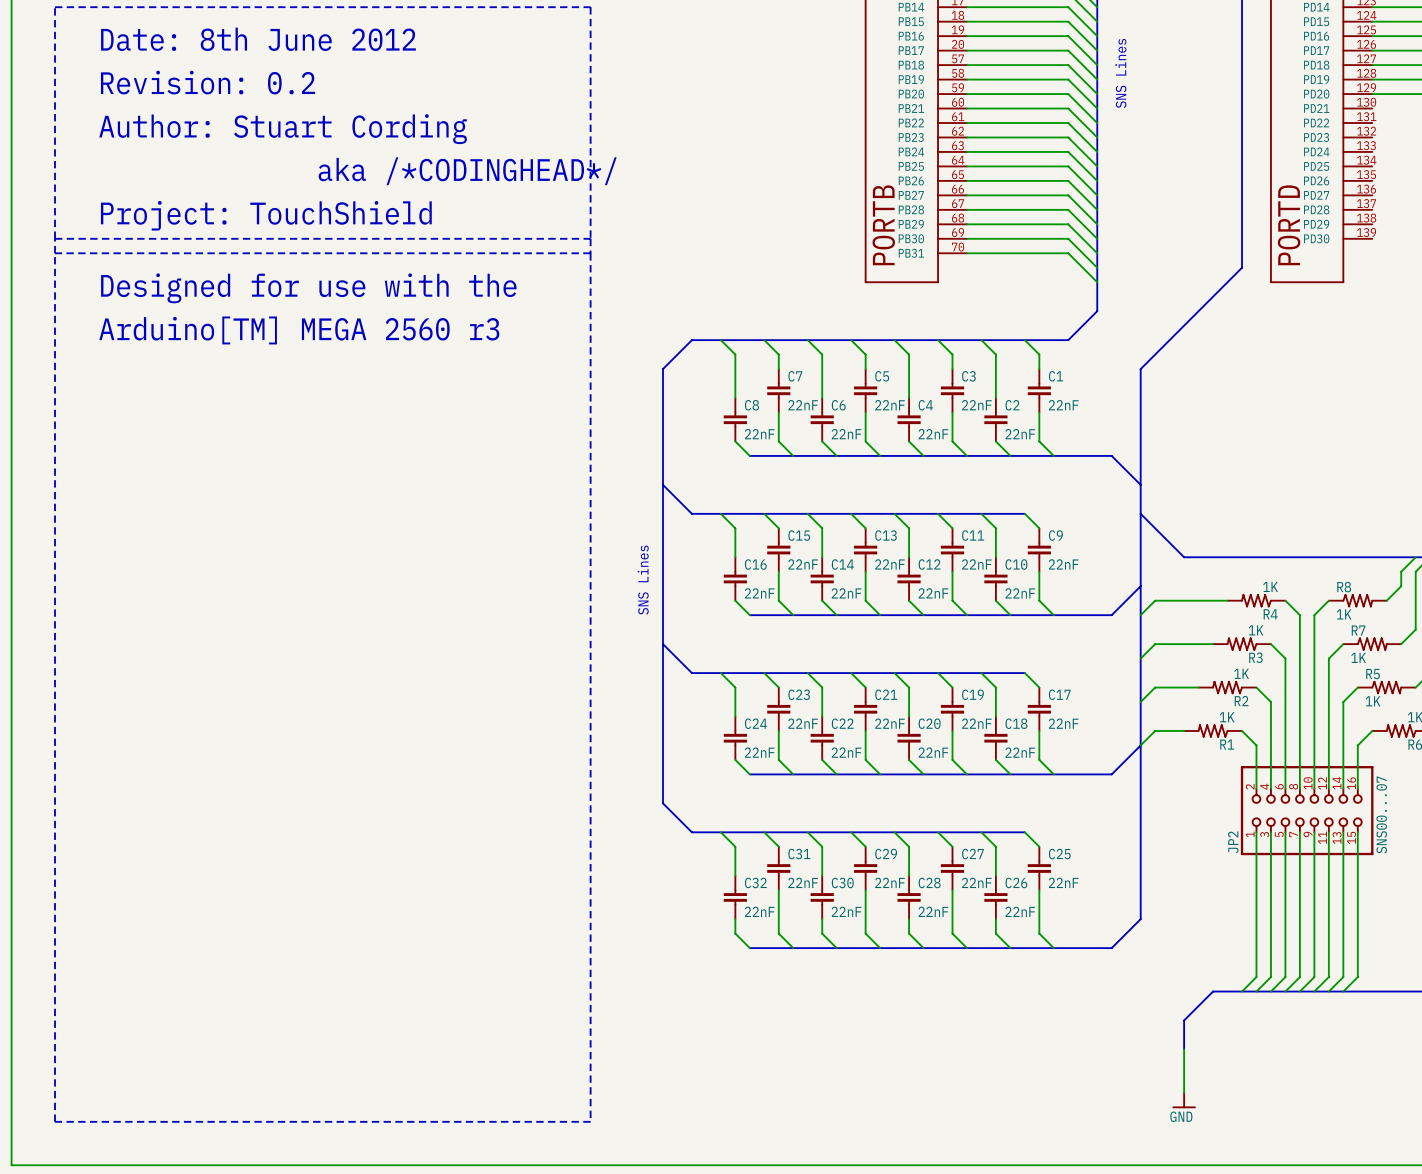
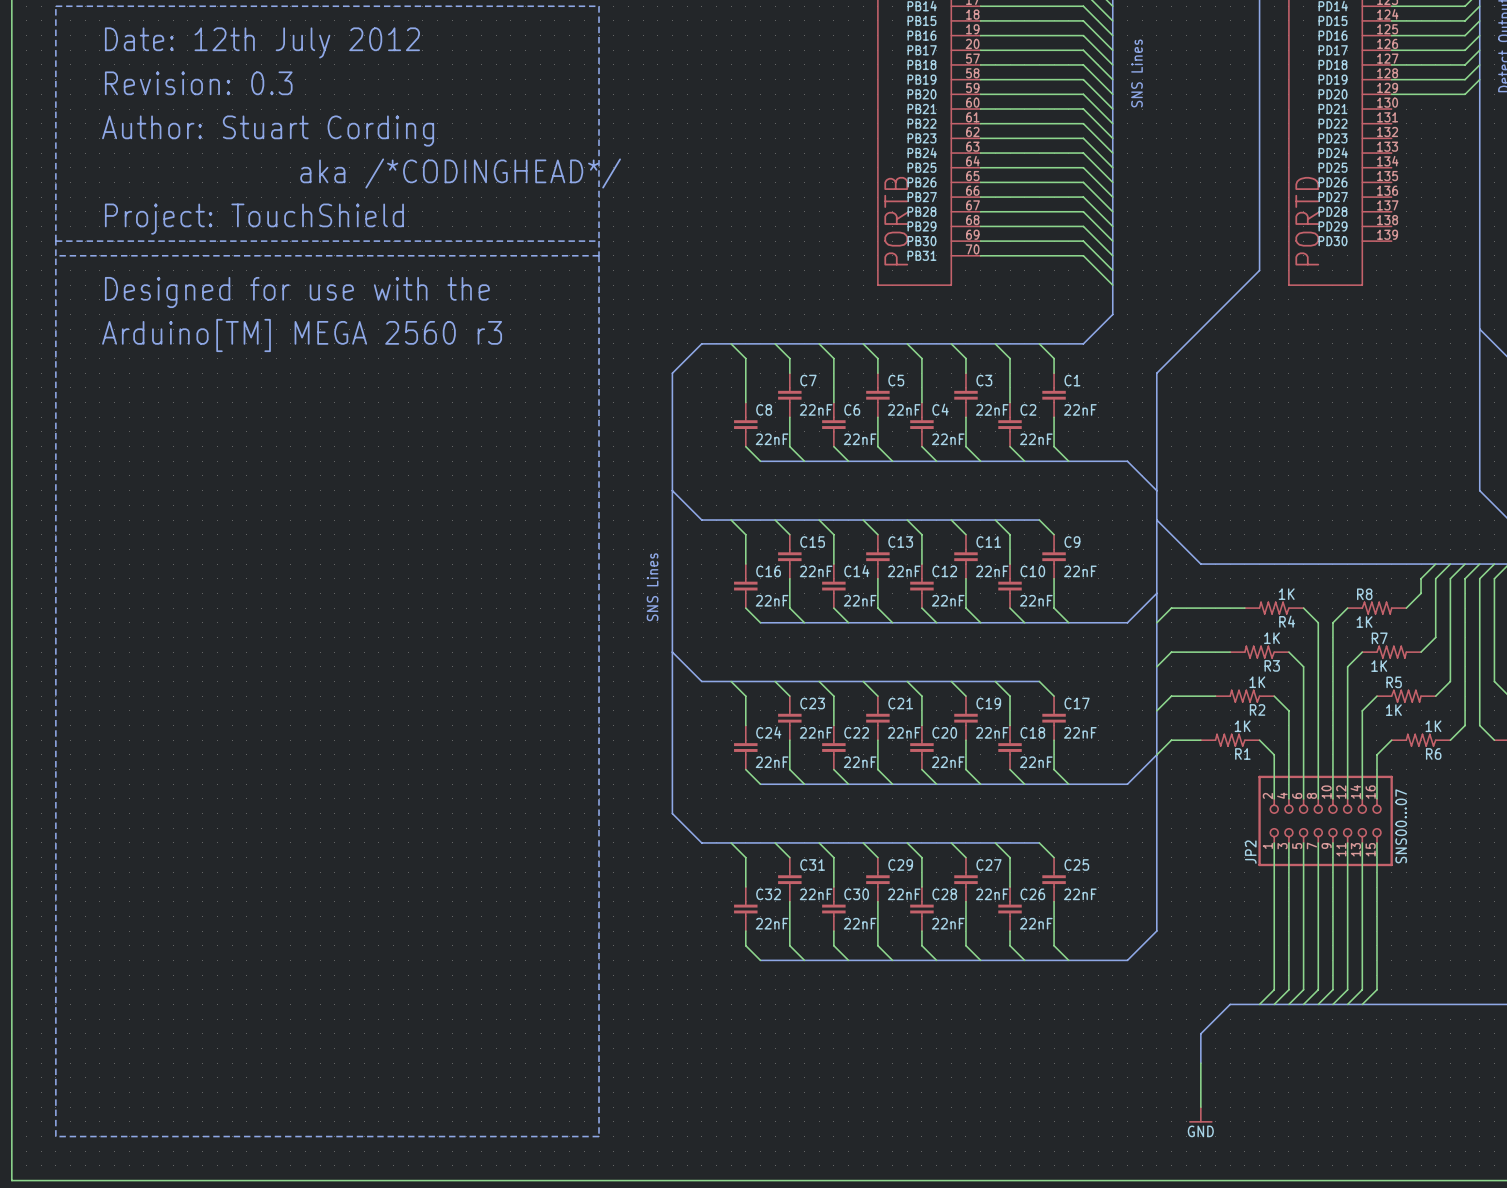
text: Date: 8th June 2012 (258, 39) -> Date: 12th July 2012 (262, 42)
text: Revision: 0.2 (208, 82) -> Revision: 0.3 (198, 83)

